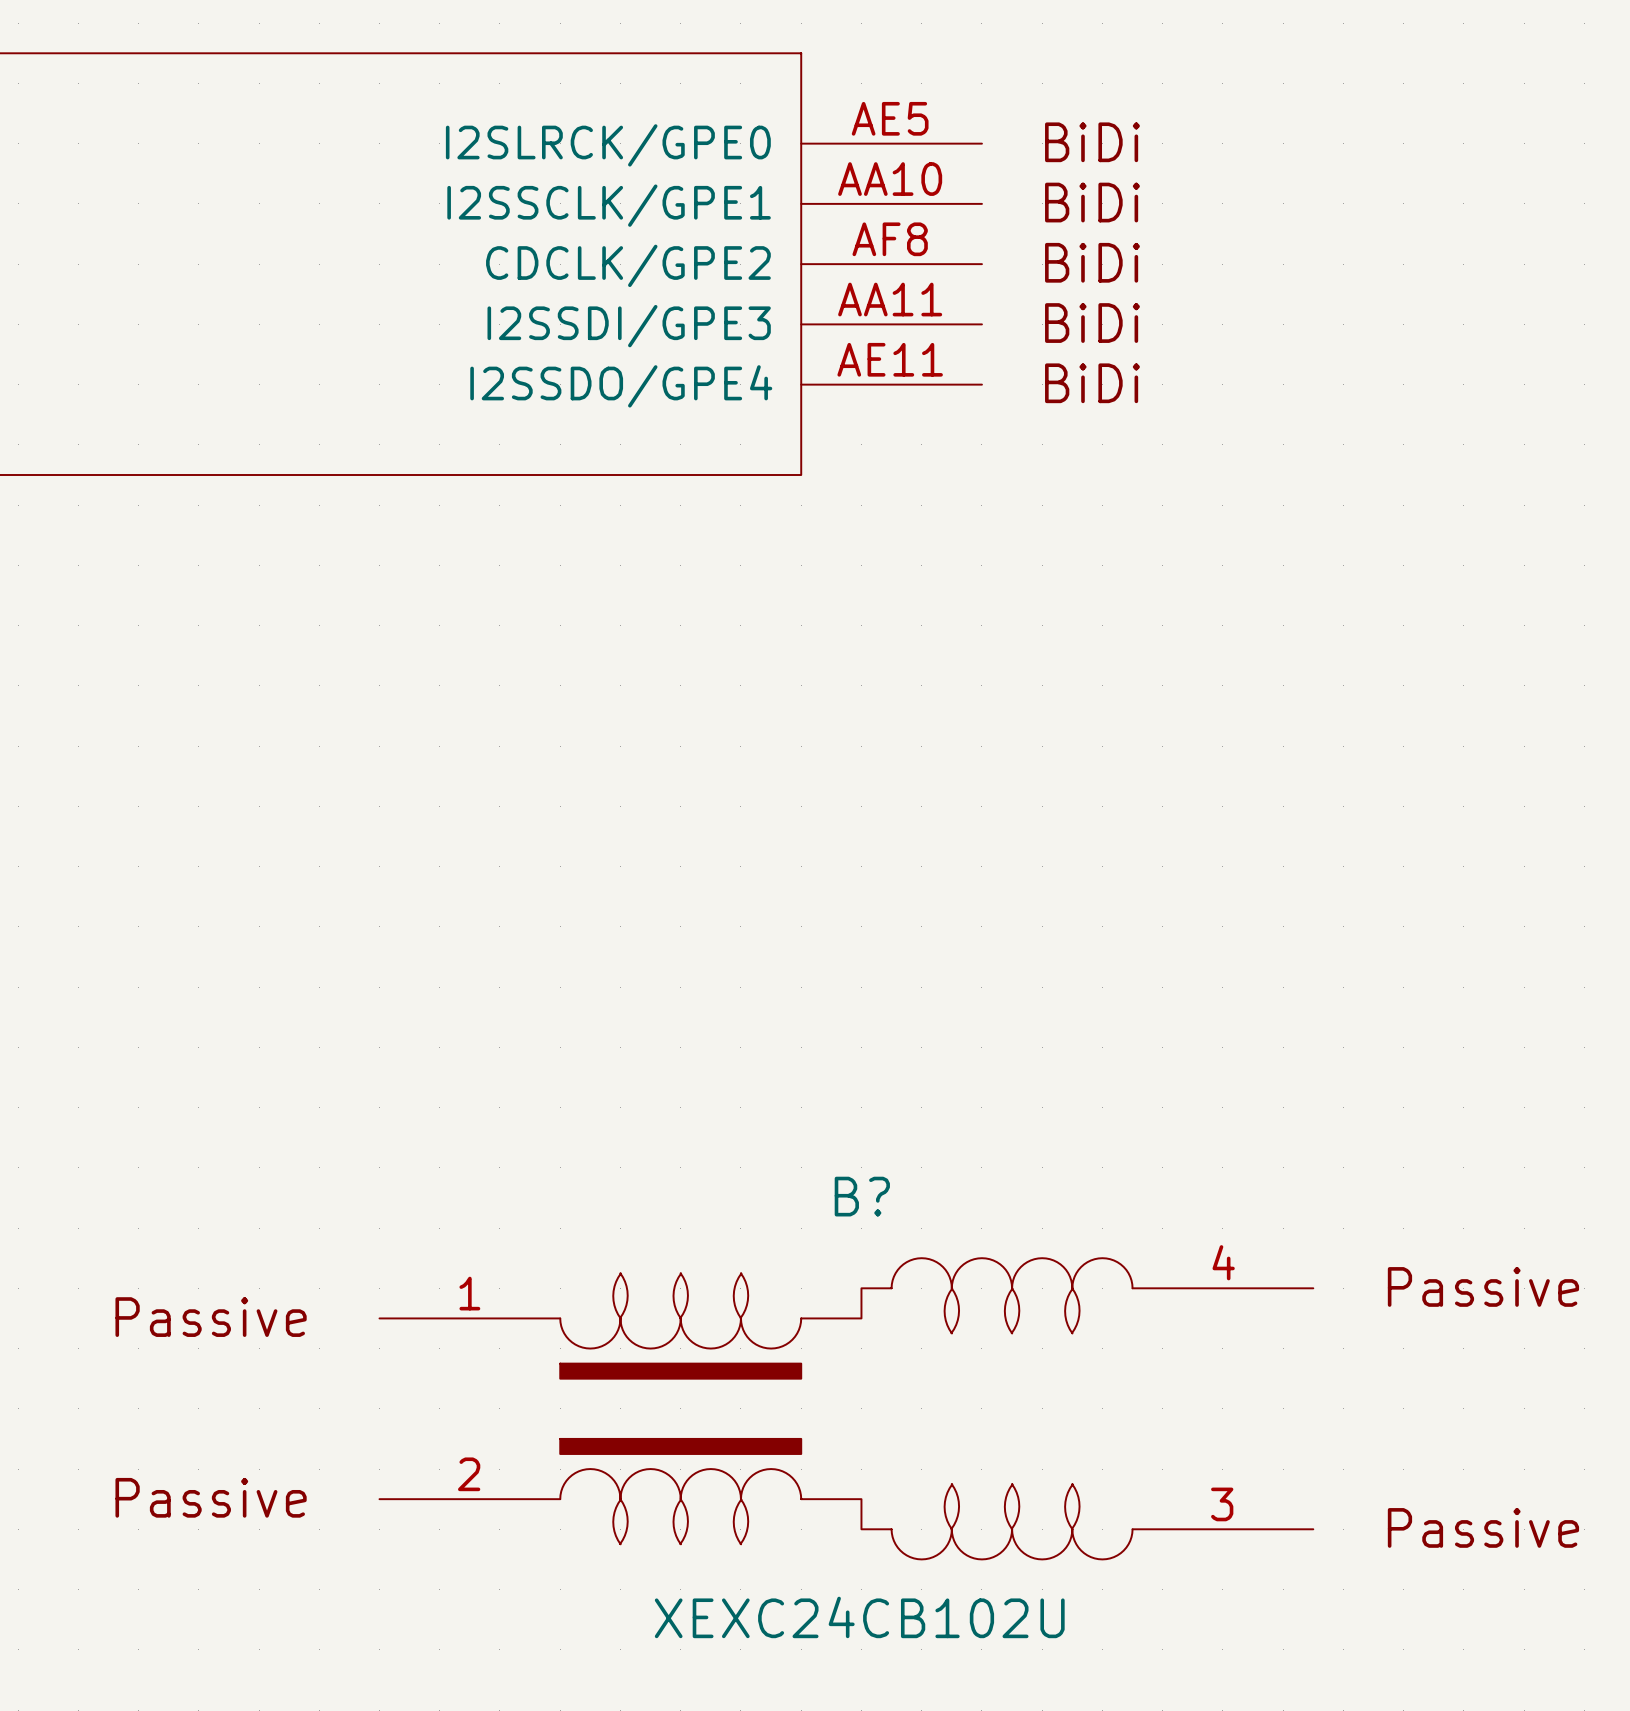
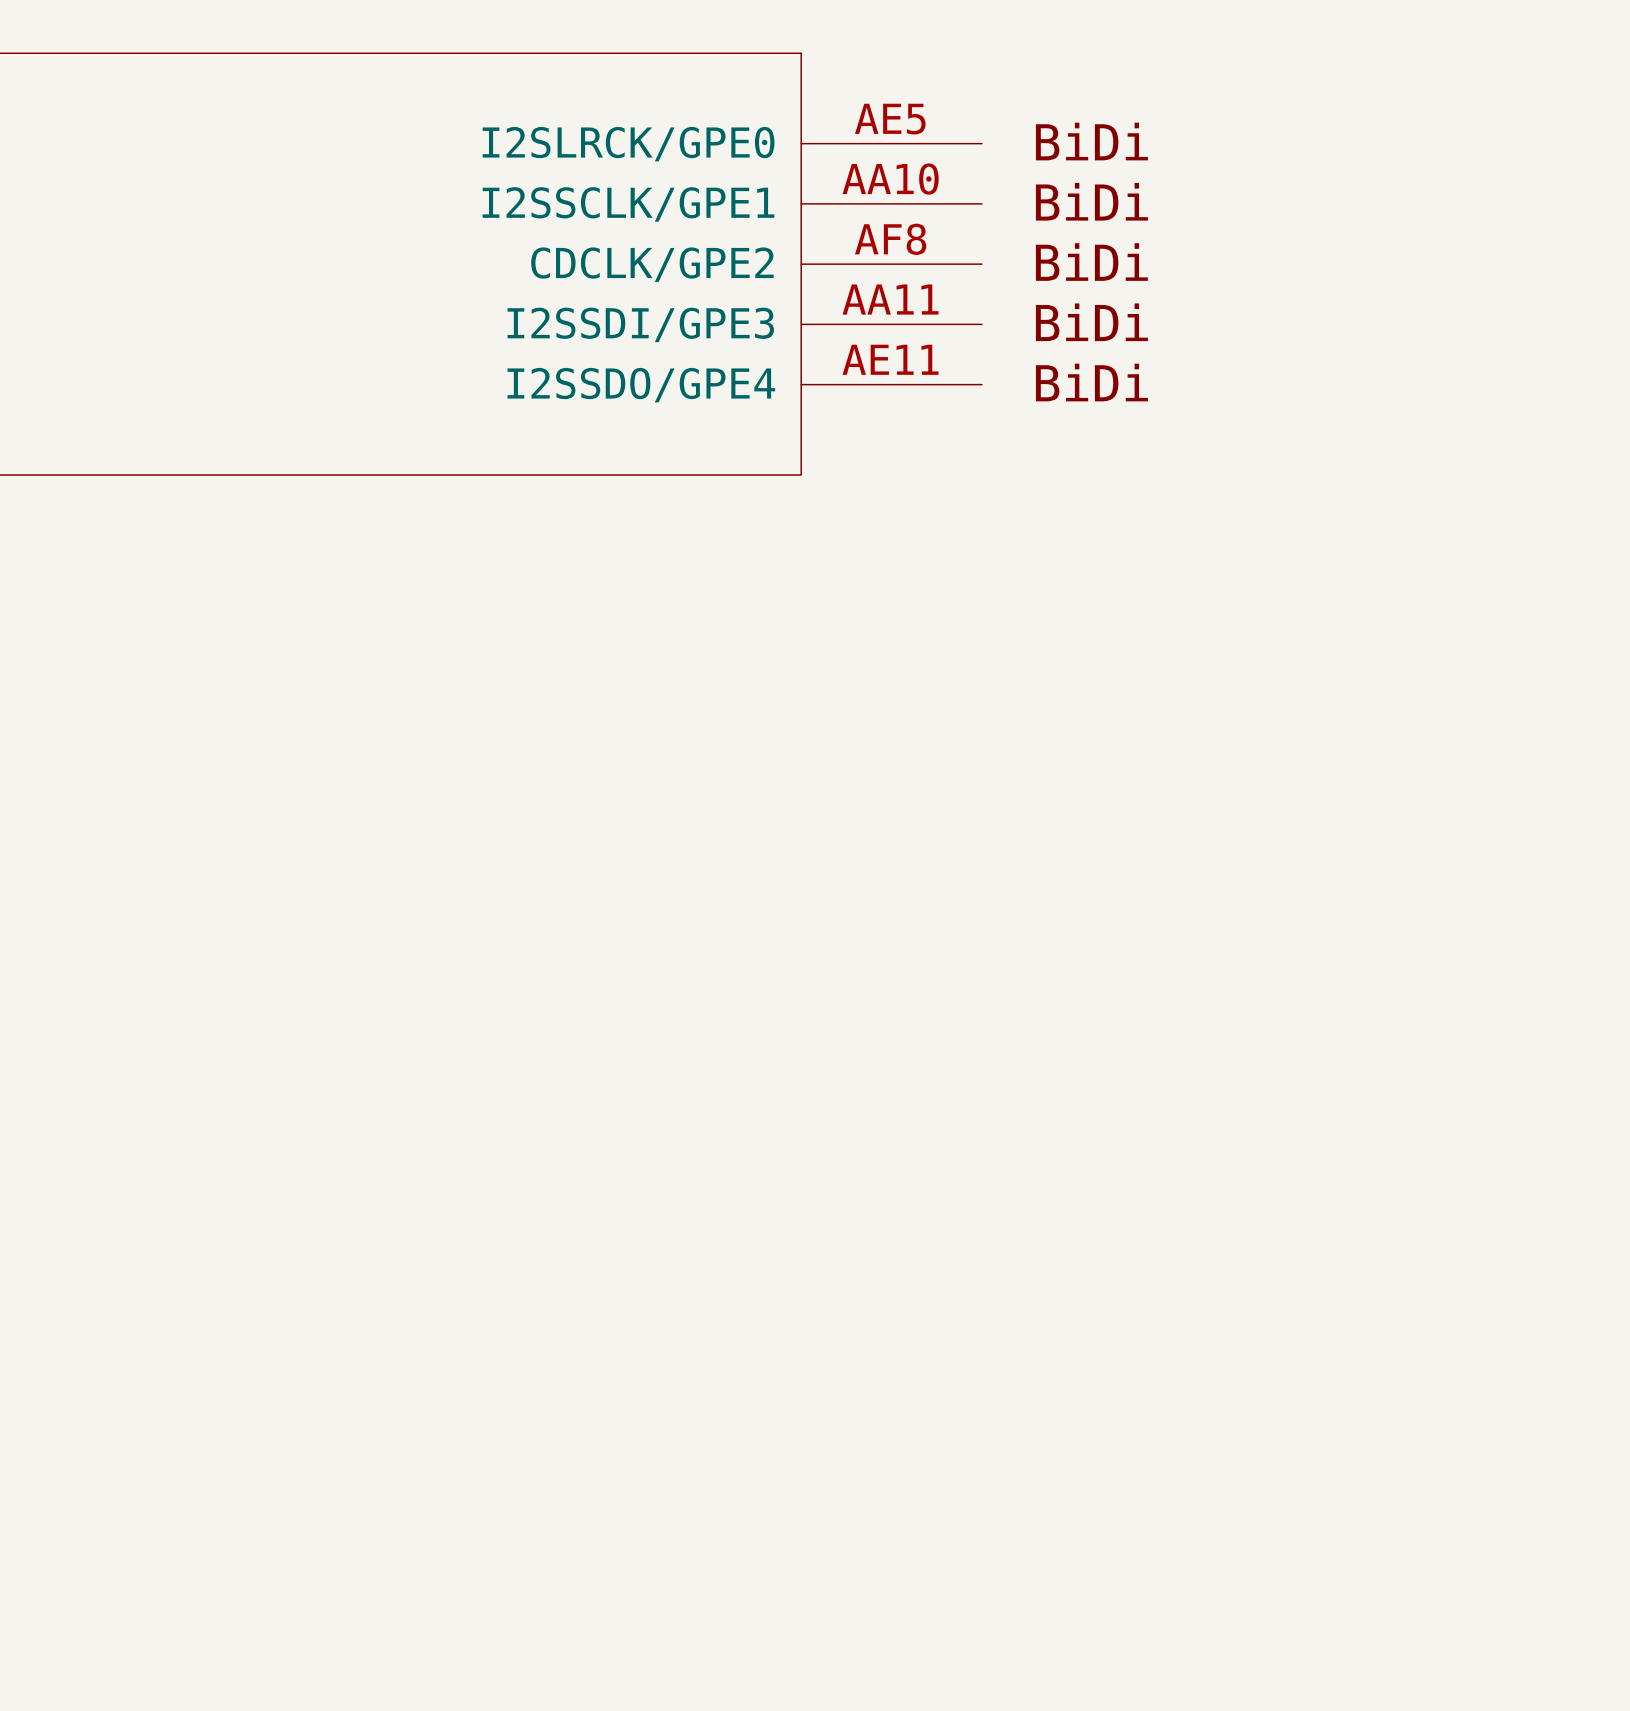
B?: XEXC24CB102U (846, 1408) -> none

